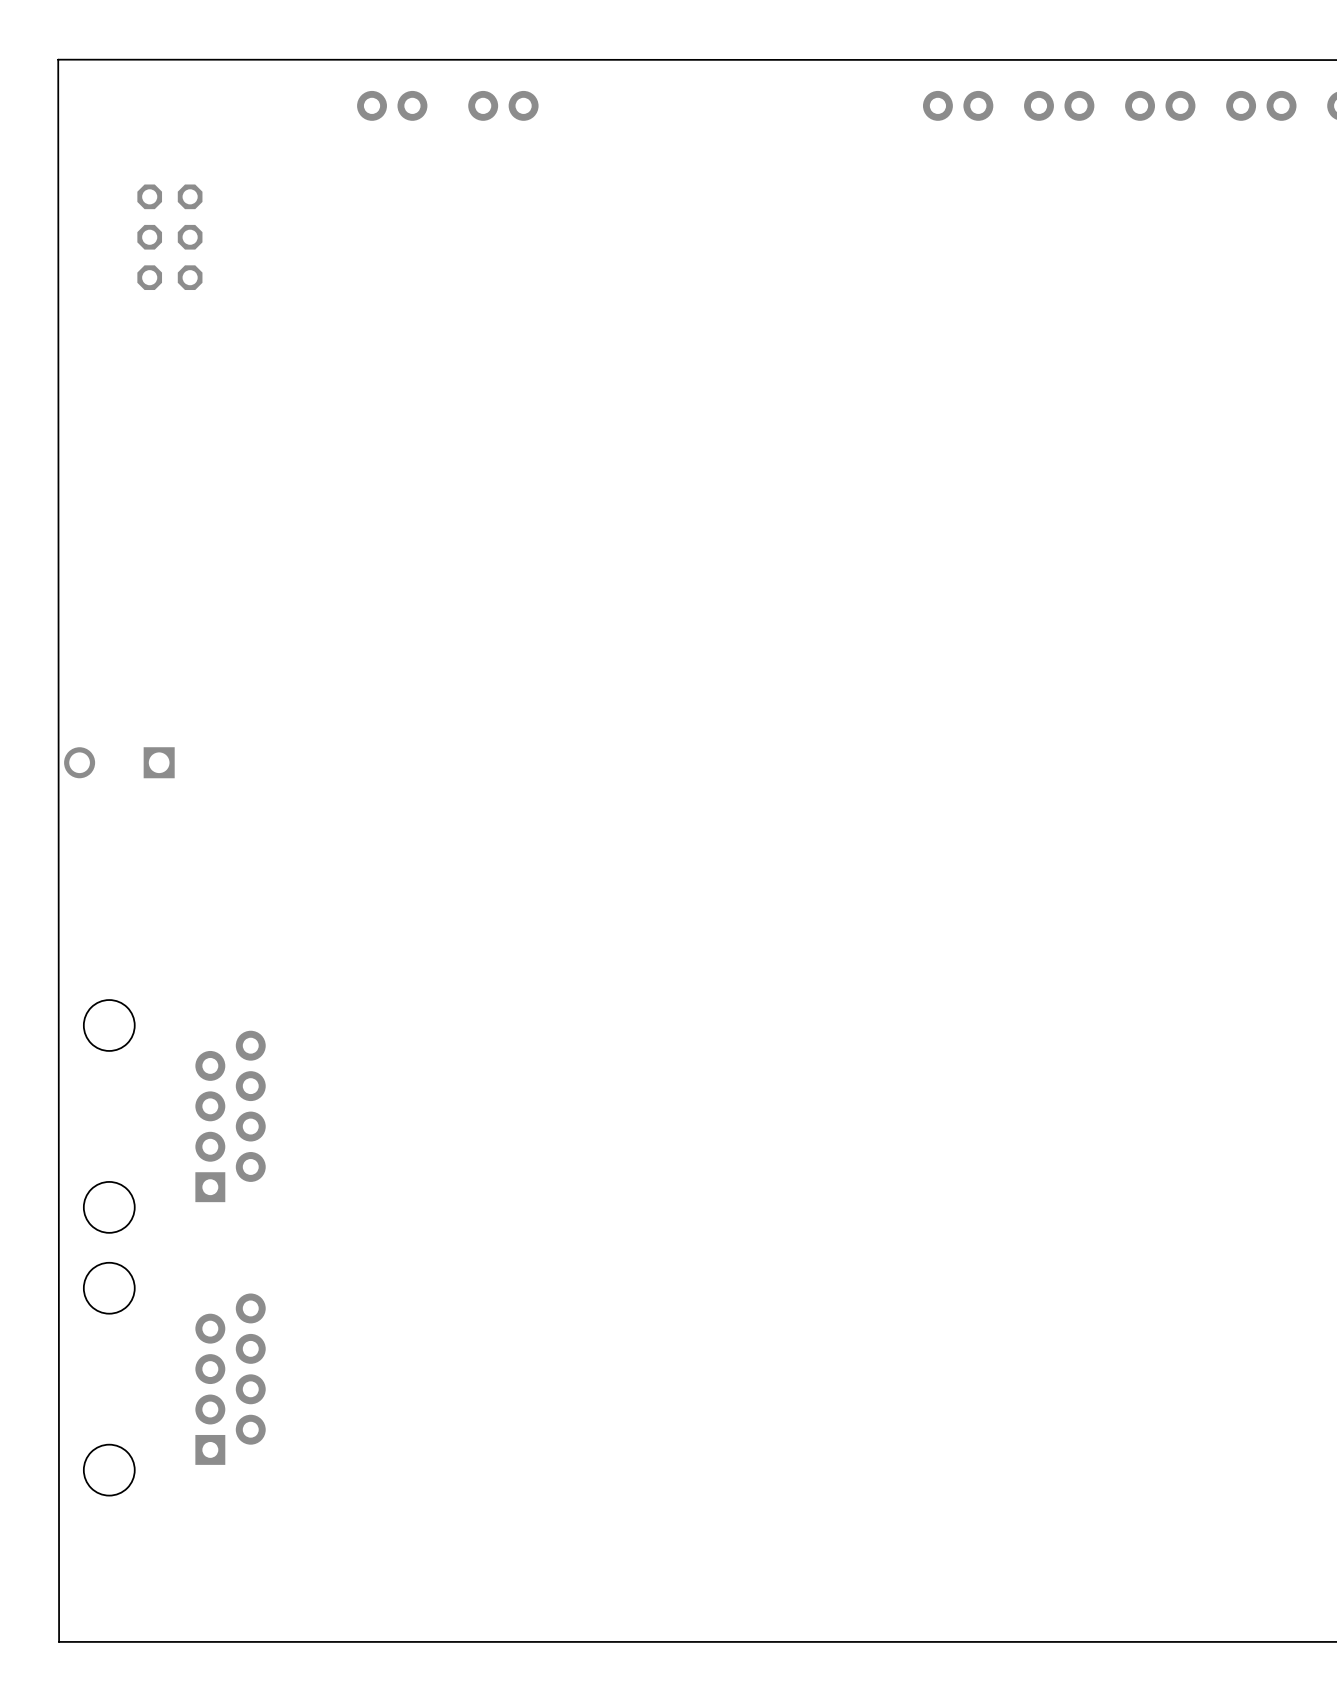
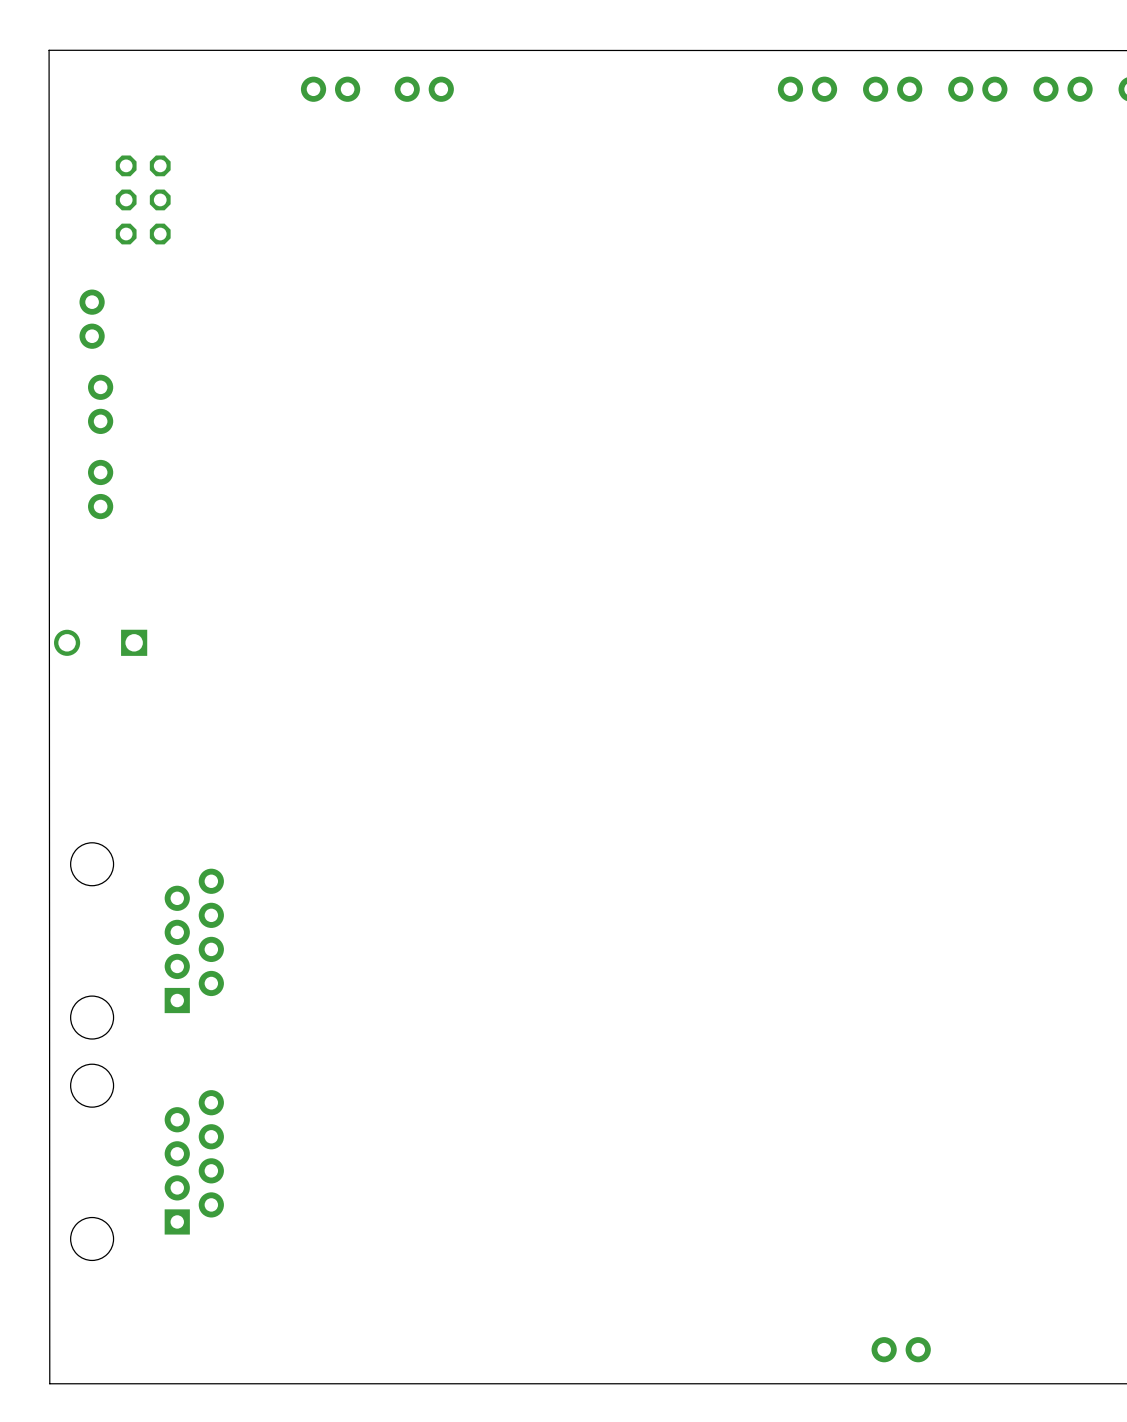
part: none -> (92, 319)
part: none -> (100, 404)
part: none -> (100, 489)
part: none -> (901, 1349)

